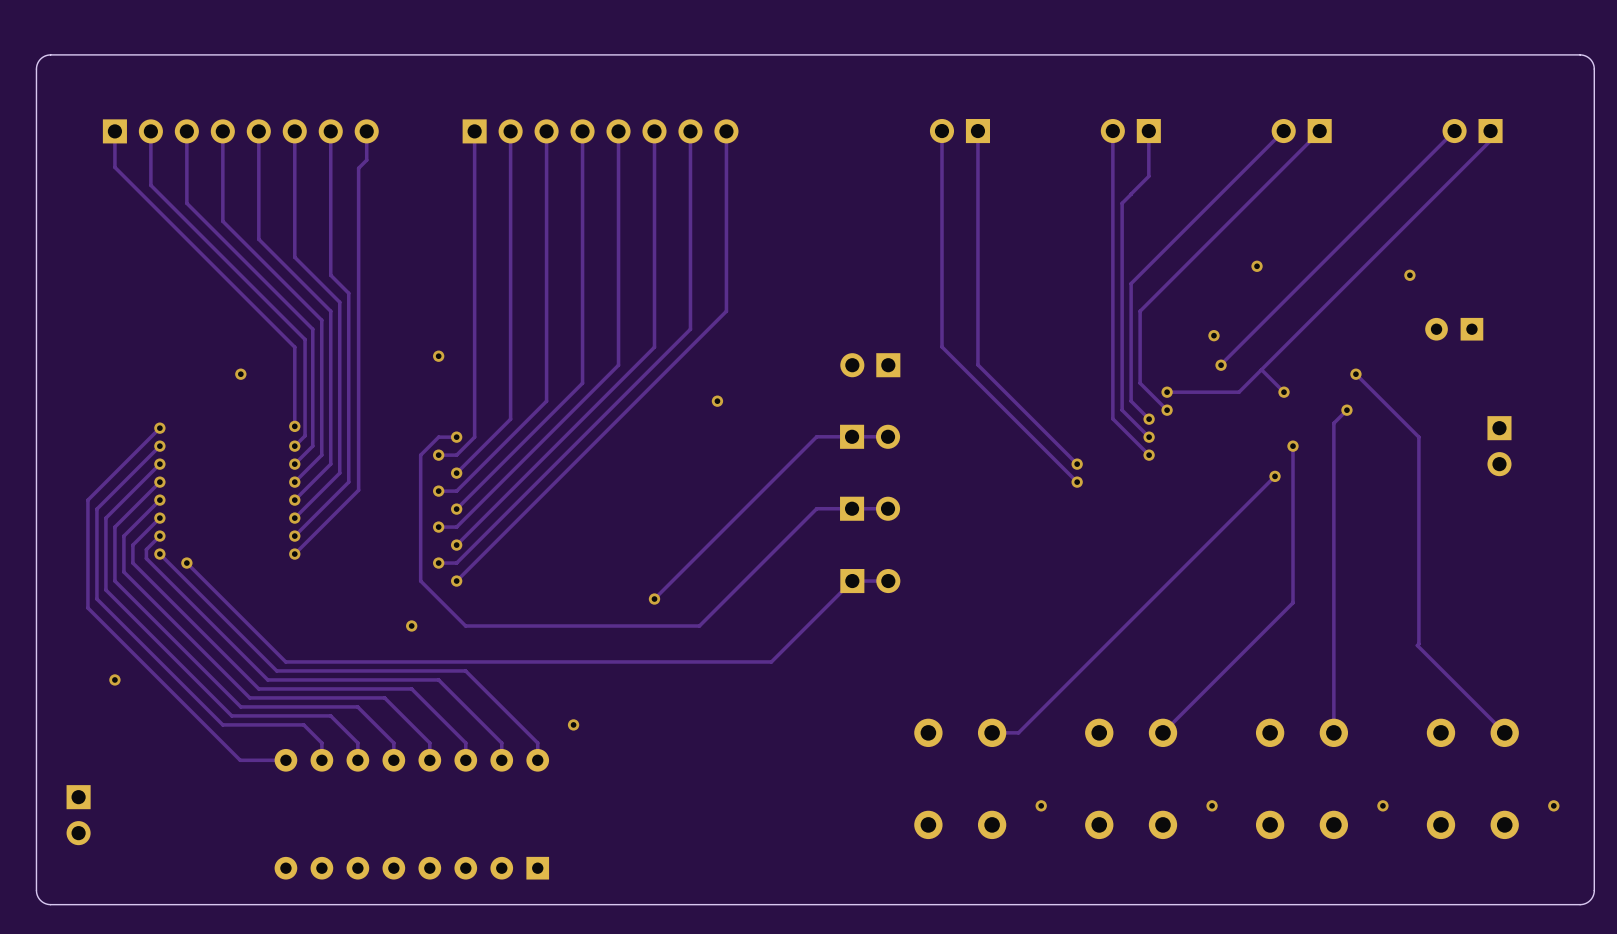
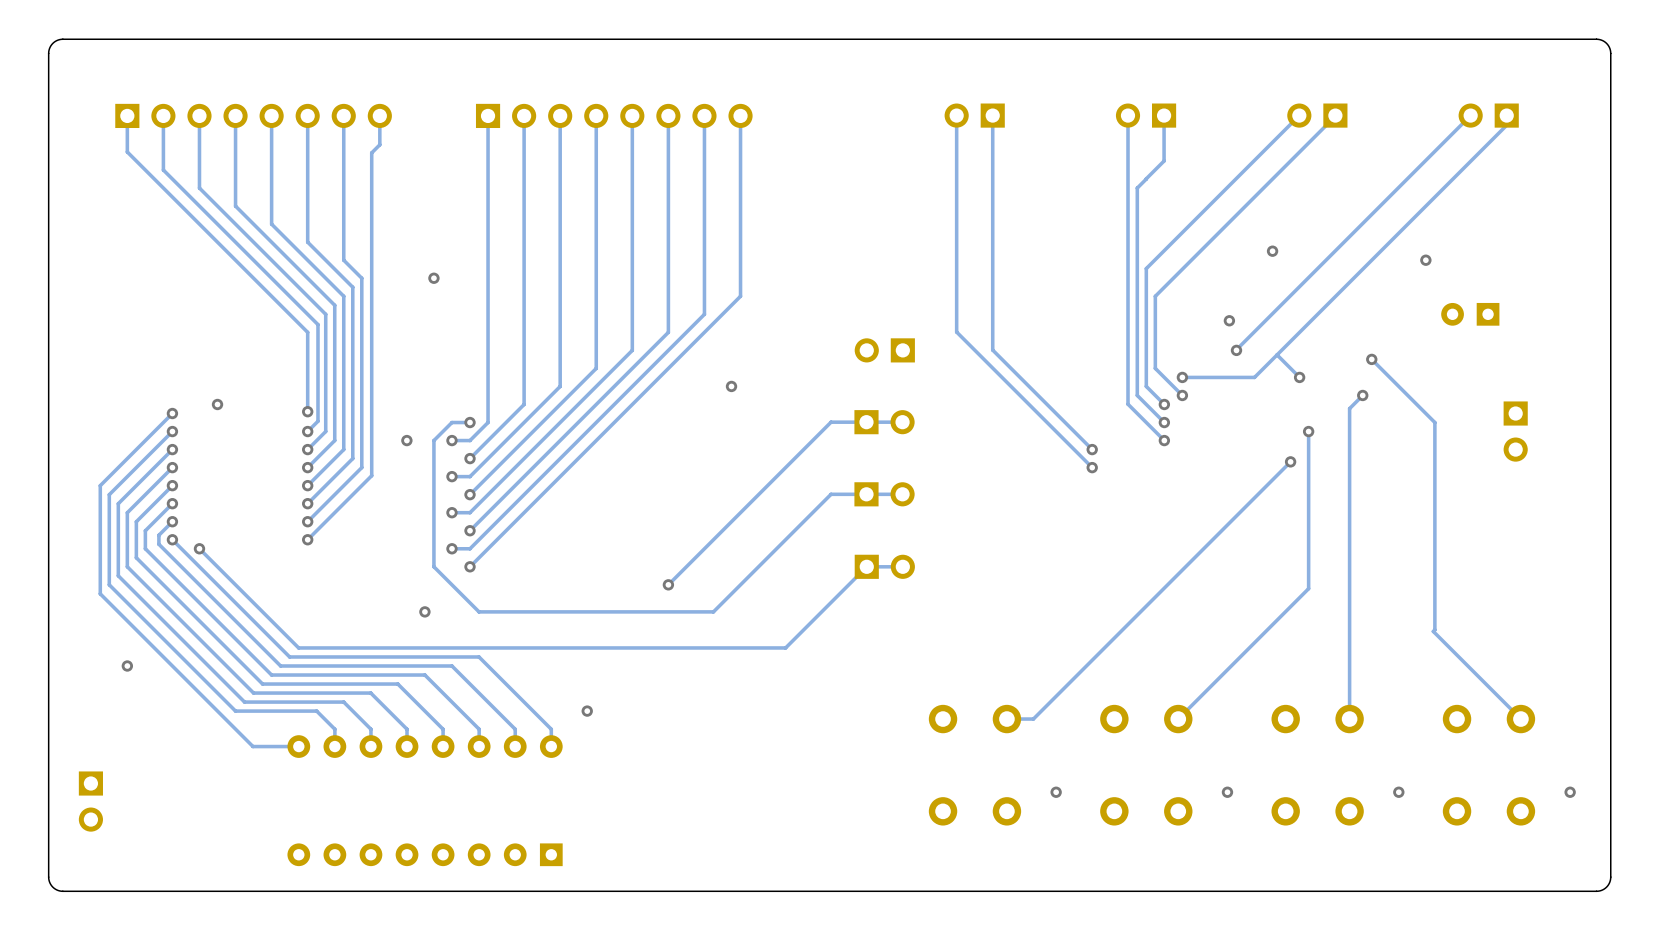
via: none -> (433, 278)
via: (438, 356) -> none
via position: (240, 374) -> (217, 404)
via: none -> (406, 440)

